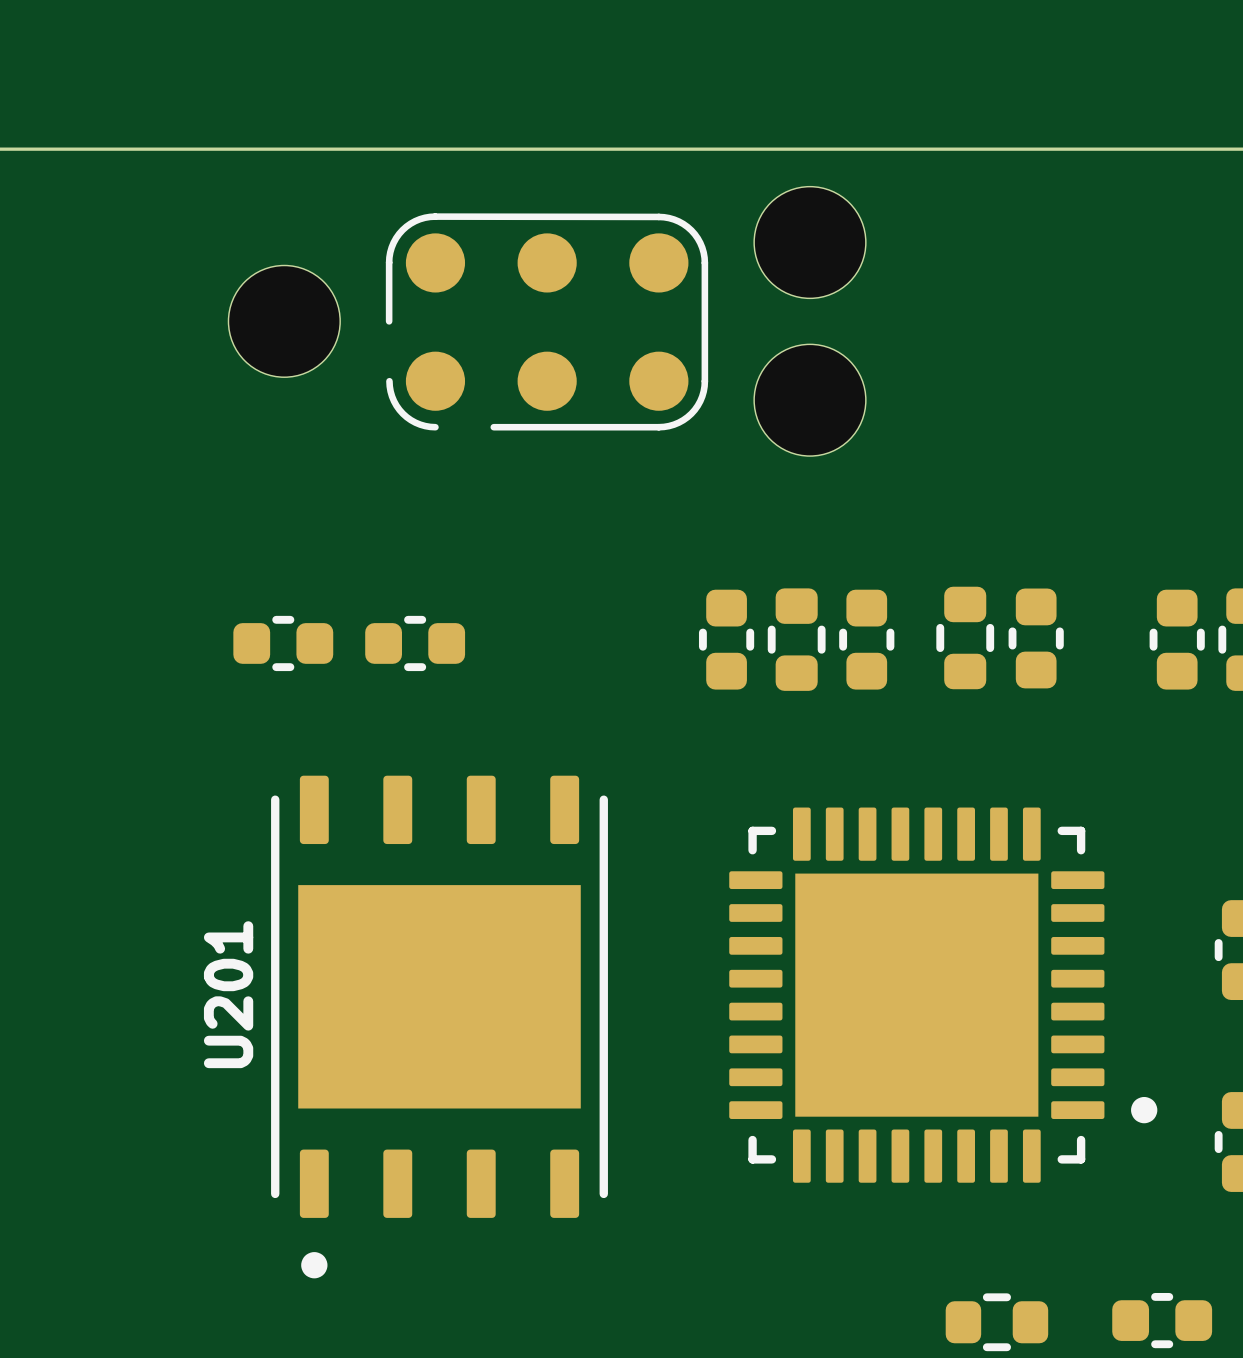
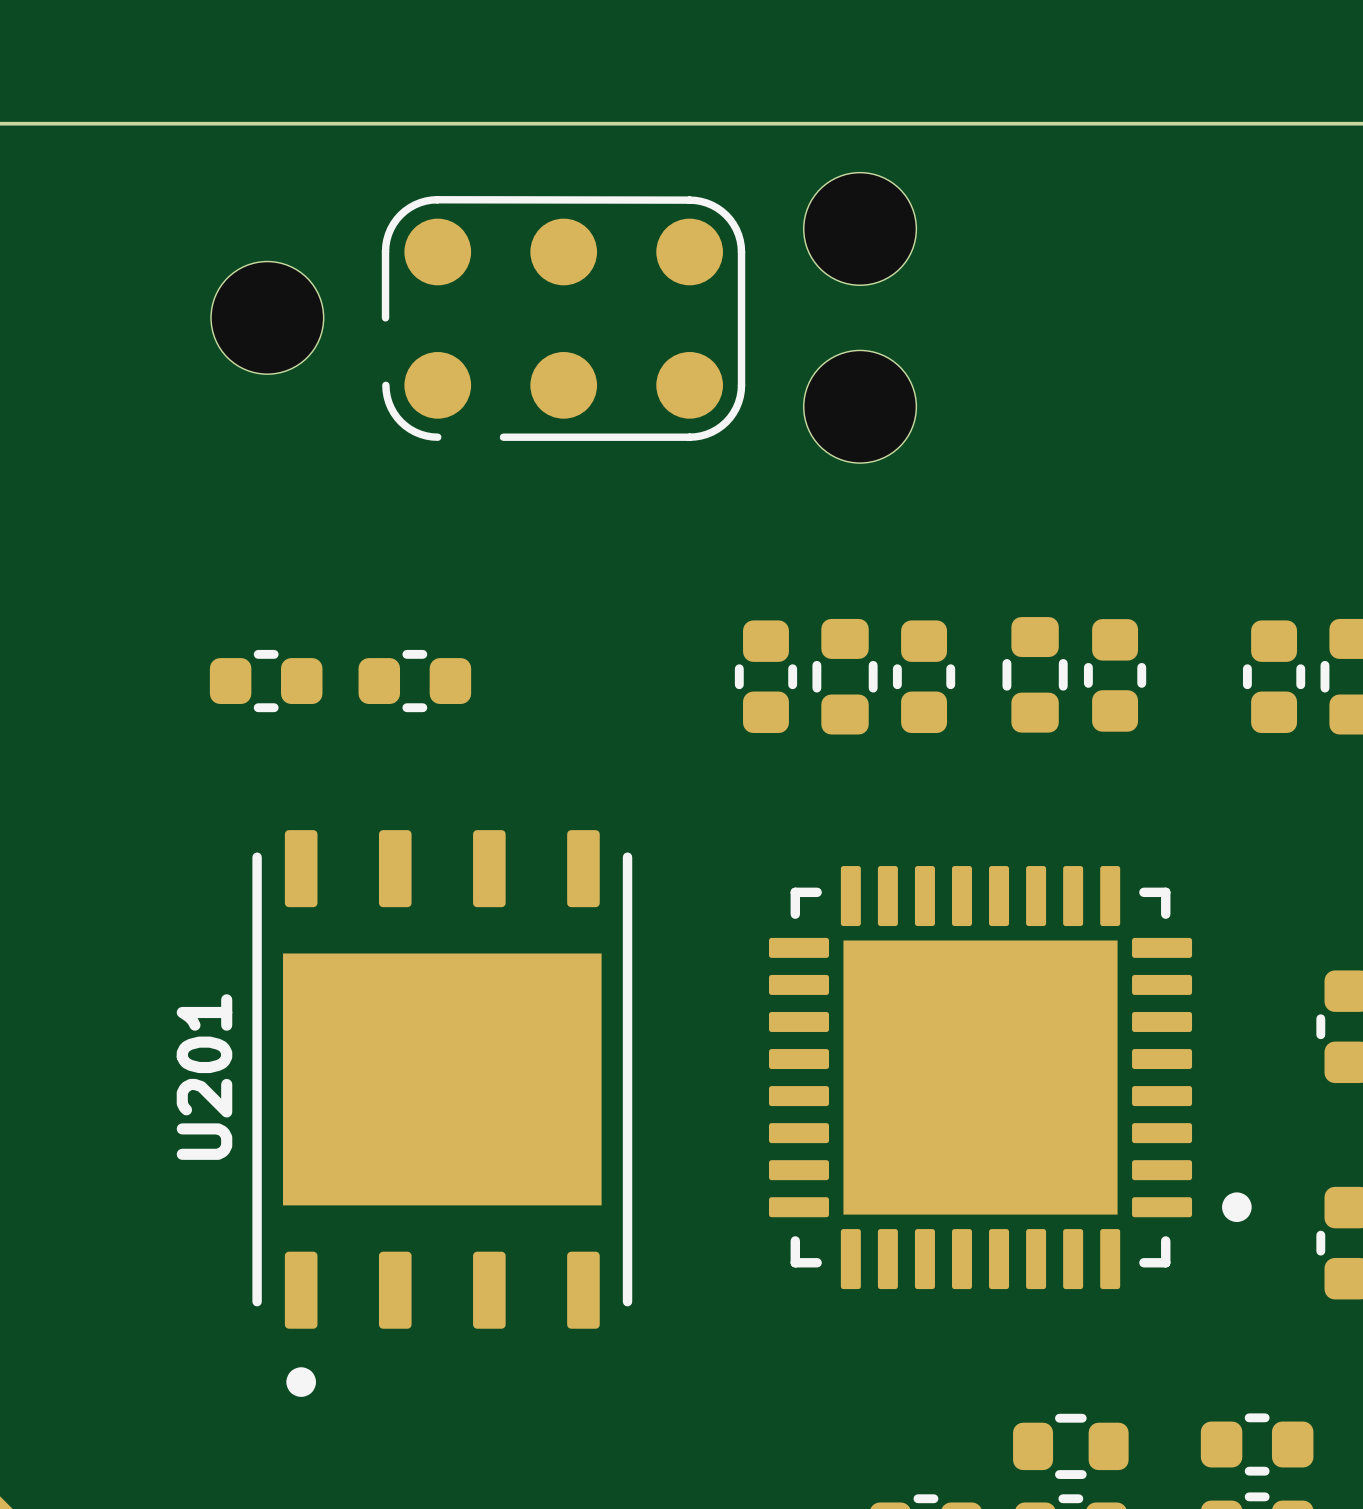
part footprint: [228, 186, 866, 457] -> [211, 172, 917, 464]

